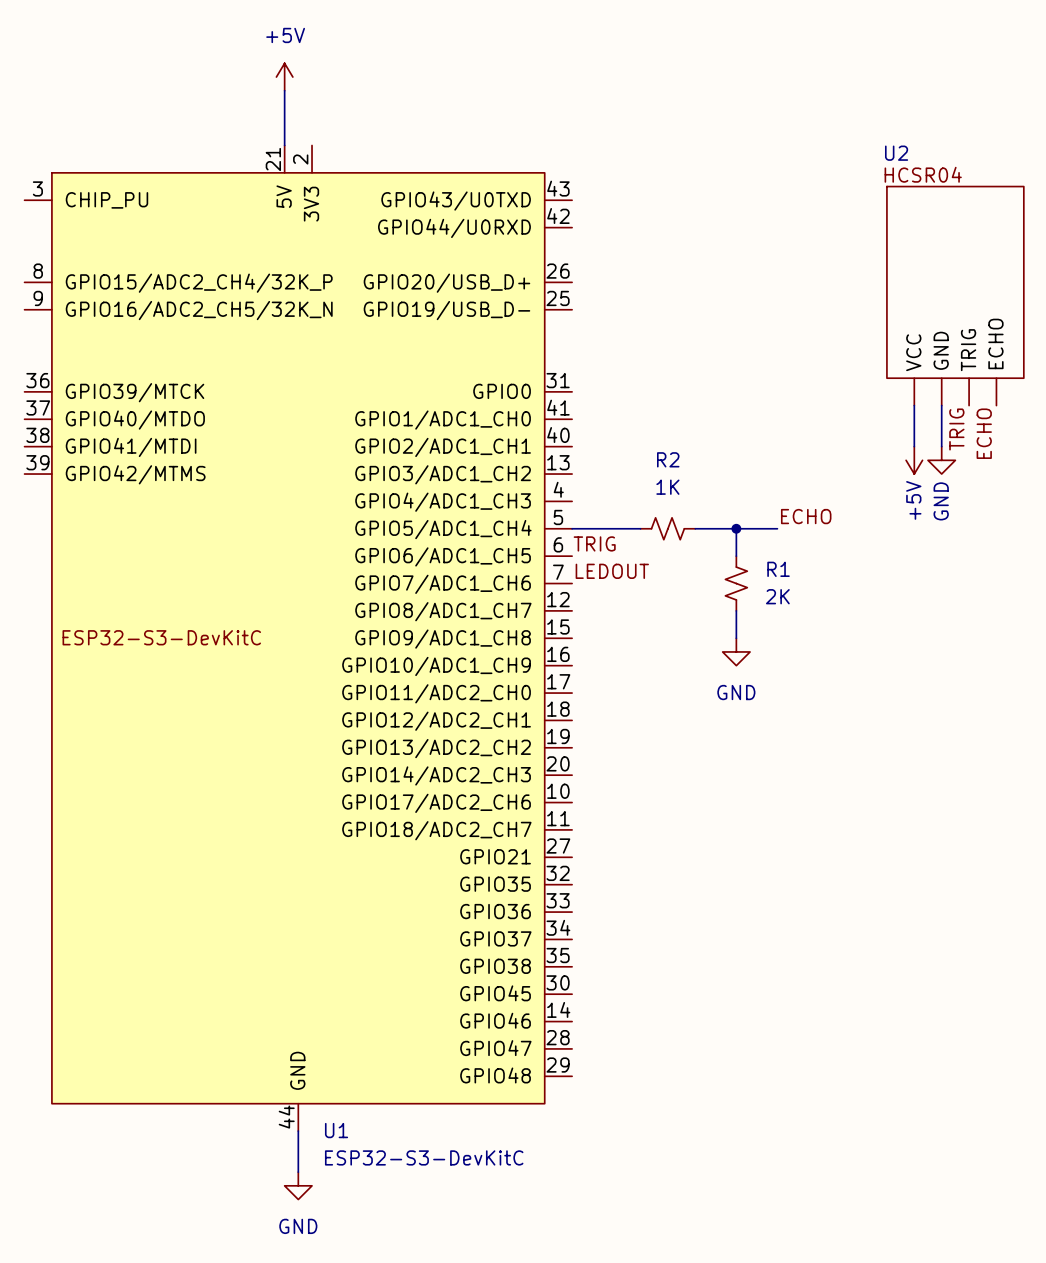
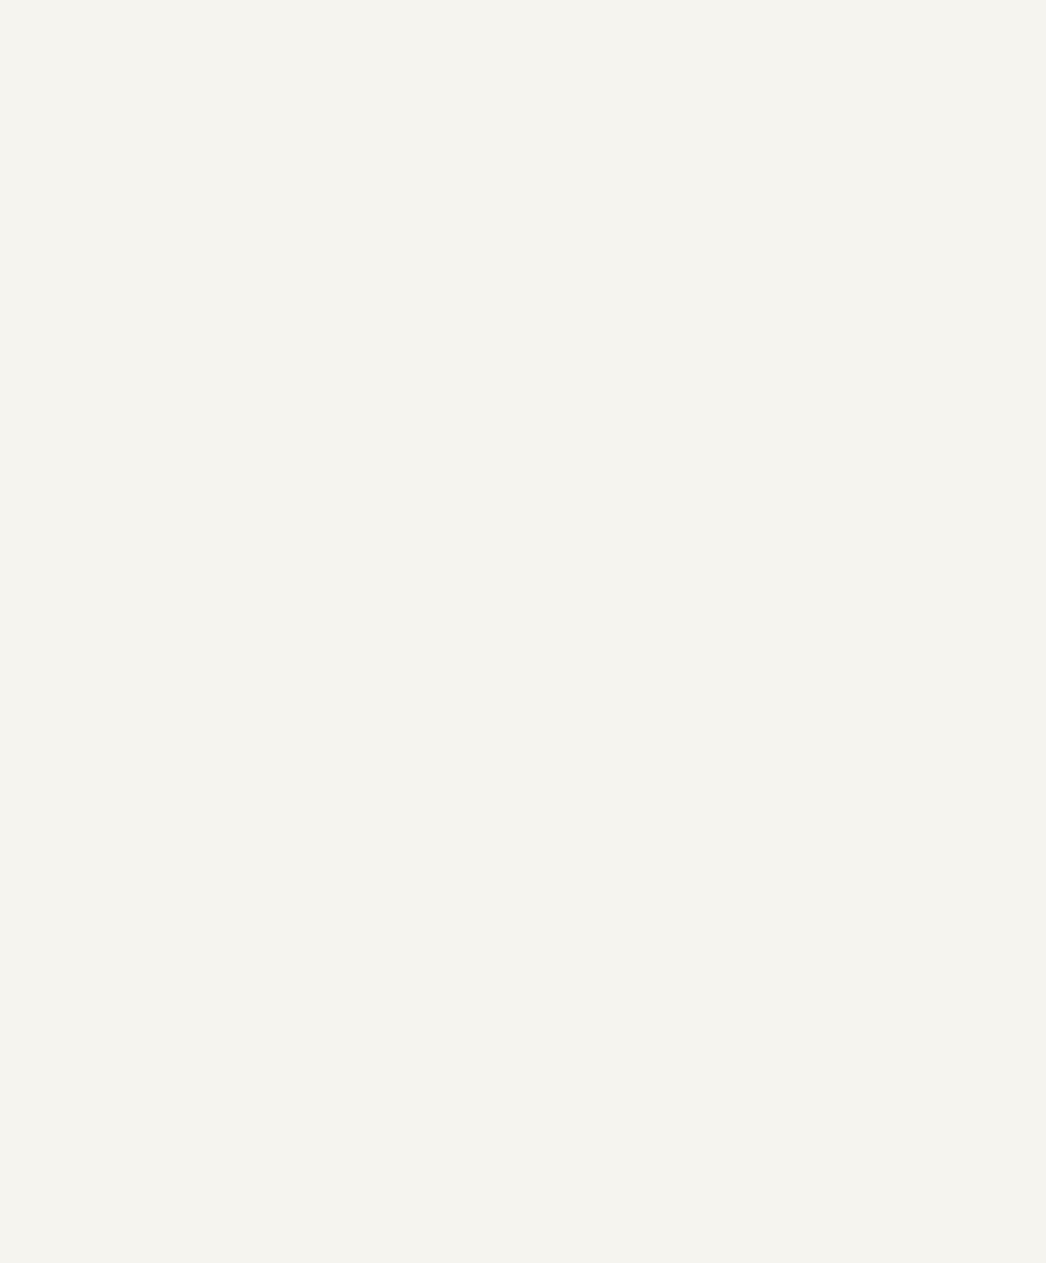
power symbol: +5V (284, 77) -> none
wire: (284, 90) (284, 145) -> none
U2: (955, 296) -> none
wire: (914, 405) (914, 446) -> none
wire: (941, 405) (941, 446) -> none
label: TRIG (956, 429) -> none
label: ECHO (984, 433) -> none
power symbol: +5V (914, 460) -> none
power symbol: GND (941, 460) -> none
label: ECHO (806, 516) -> none
wire: (572, 528) (640, 528) -> none
R2: 1K (667, 528) -> none
wire: (695, 528) (777, 528) -> none
wire: (736, 528) (736, 556) -> none
junction: (736, 528) -> none
label: TRIG (594, 543) -> none
label: LEDOUT (612, 571) -> none
R1: 2K (736, 583) -> none
wire: (736, 610) (736, 638) -> none
U1: ESP32-S3-DevKitC (298, 638) -> none
power symbol: GND (736, 651) -> none
wire: (298, 1131) (298, 1172) -> none
power symbol: GND (298, 1185) -> none

